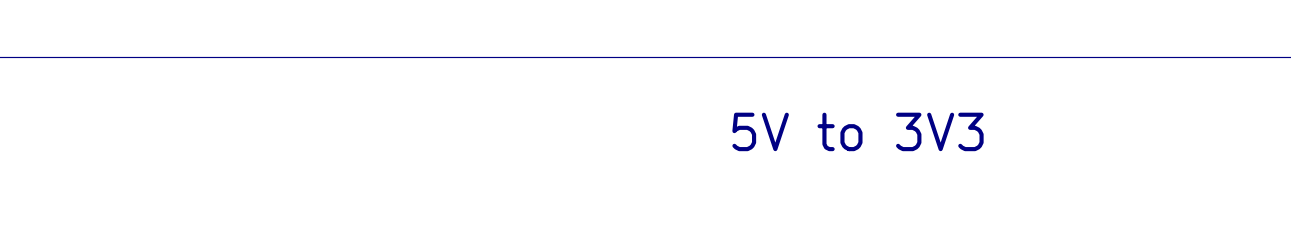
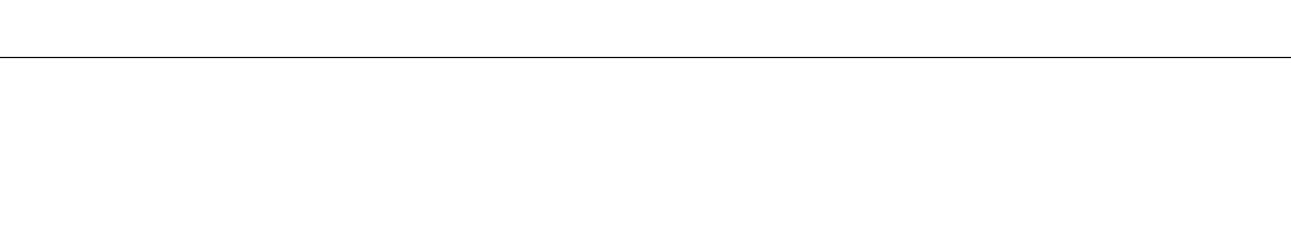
text: 5V to 3V3 (858, 131) -> none

